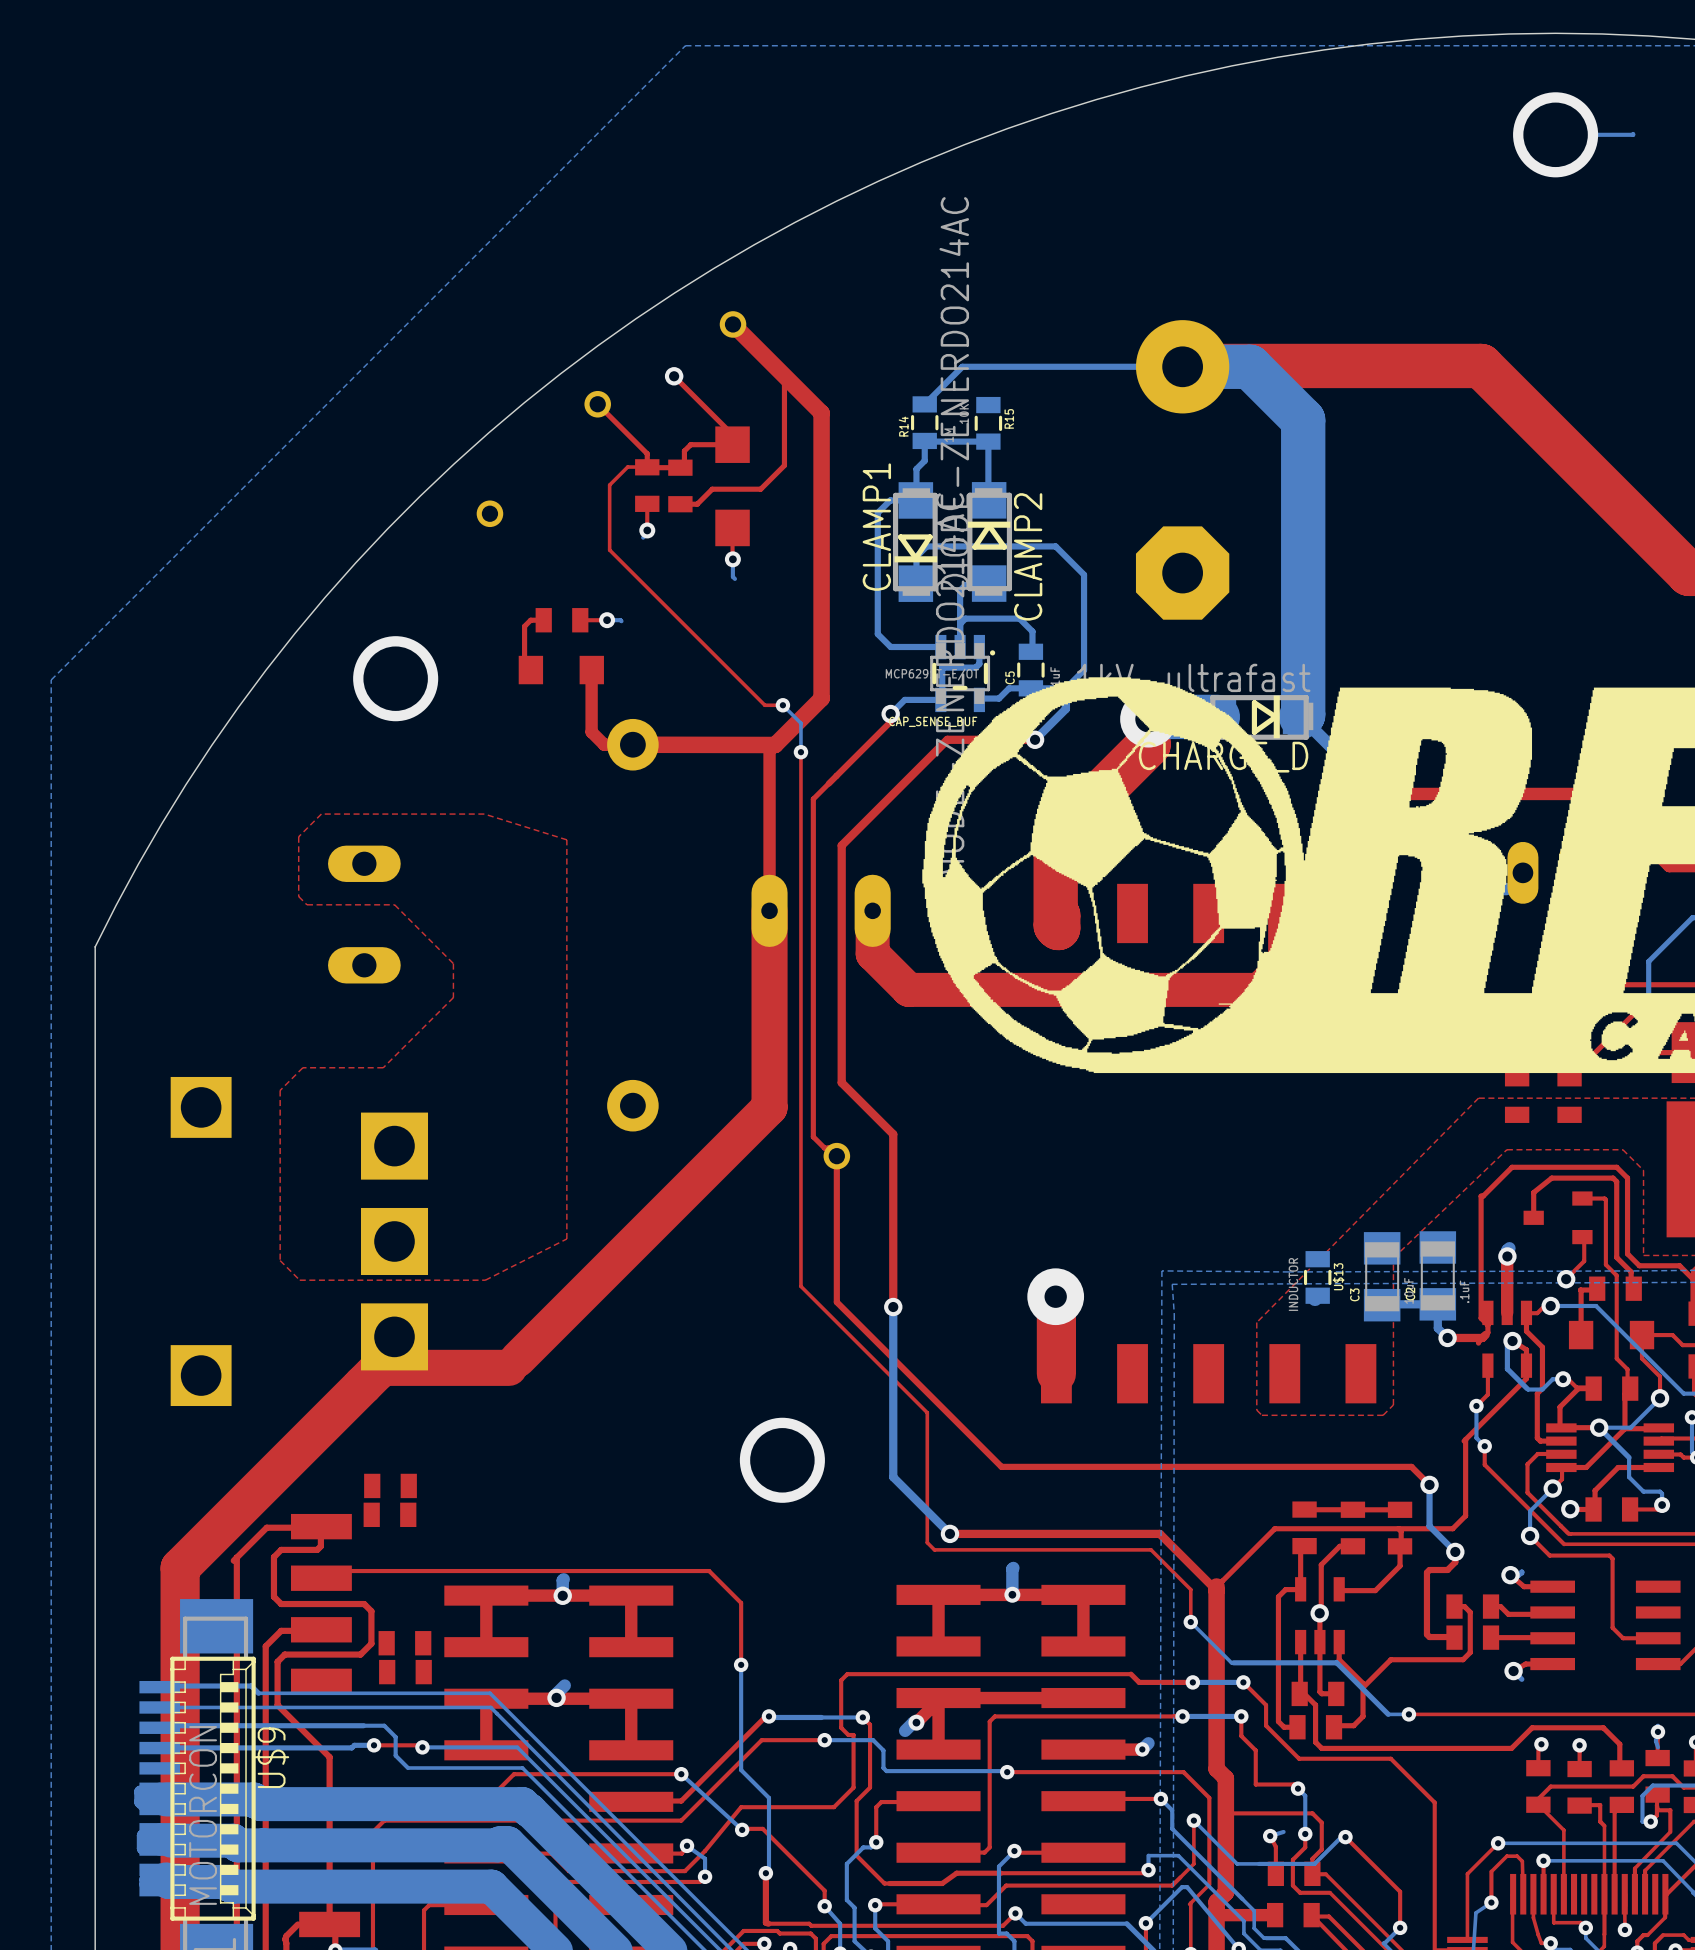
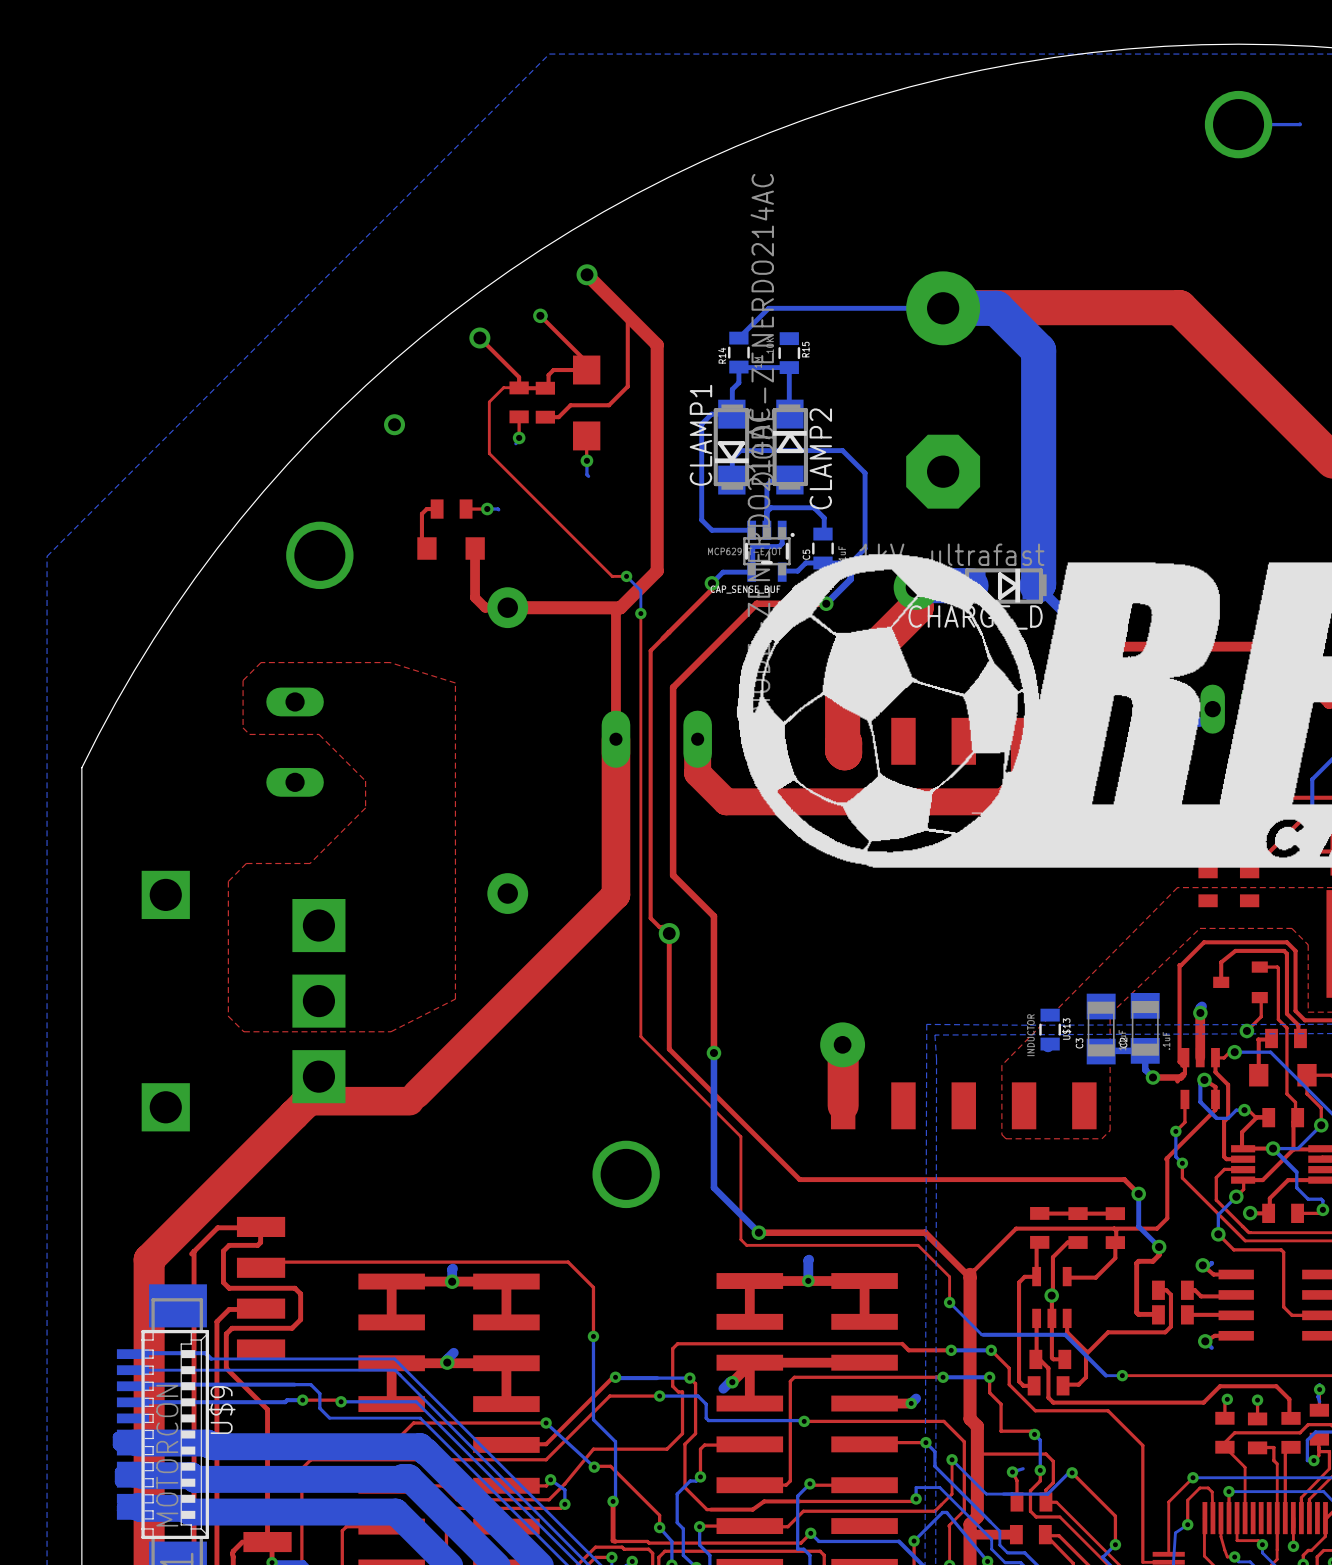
part: (390, 1485) -> none
part: (389, 1514) -> none
part: (404, 1643) -> none
part: (405, 1672) -> none

